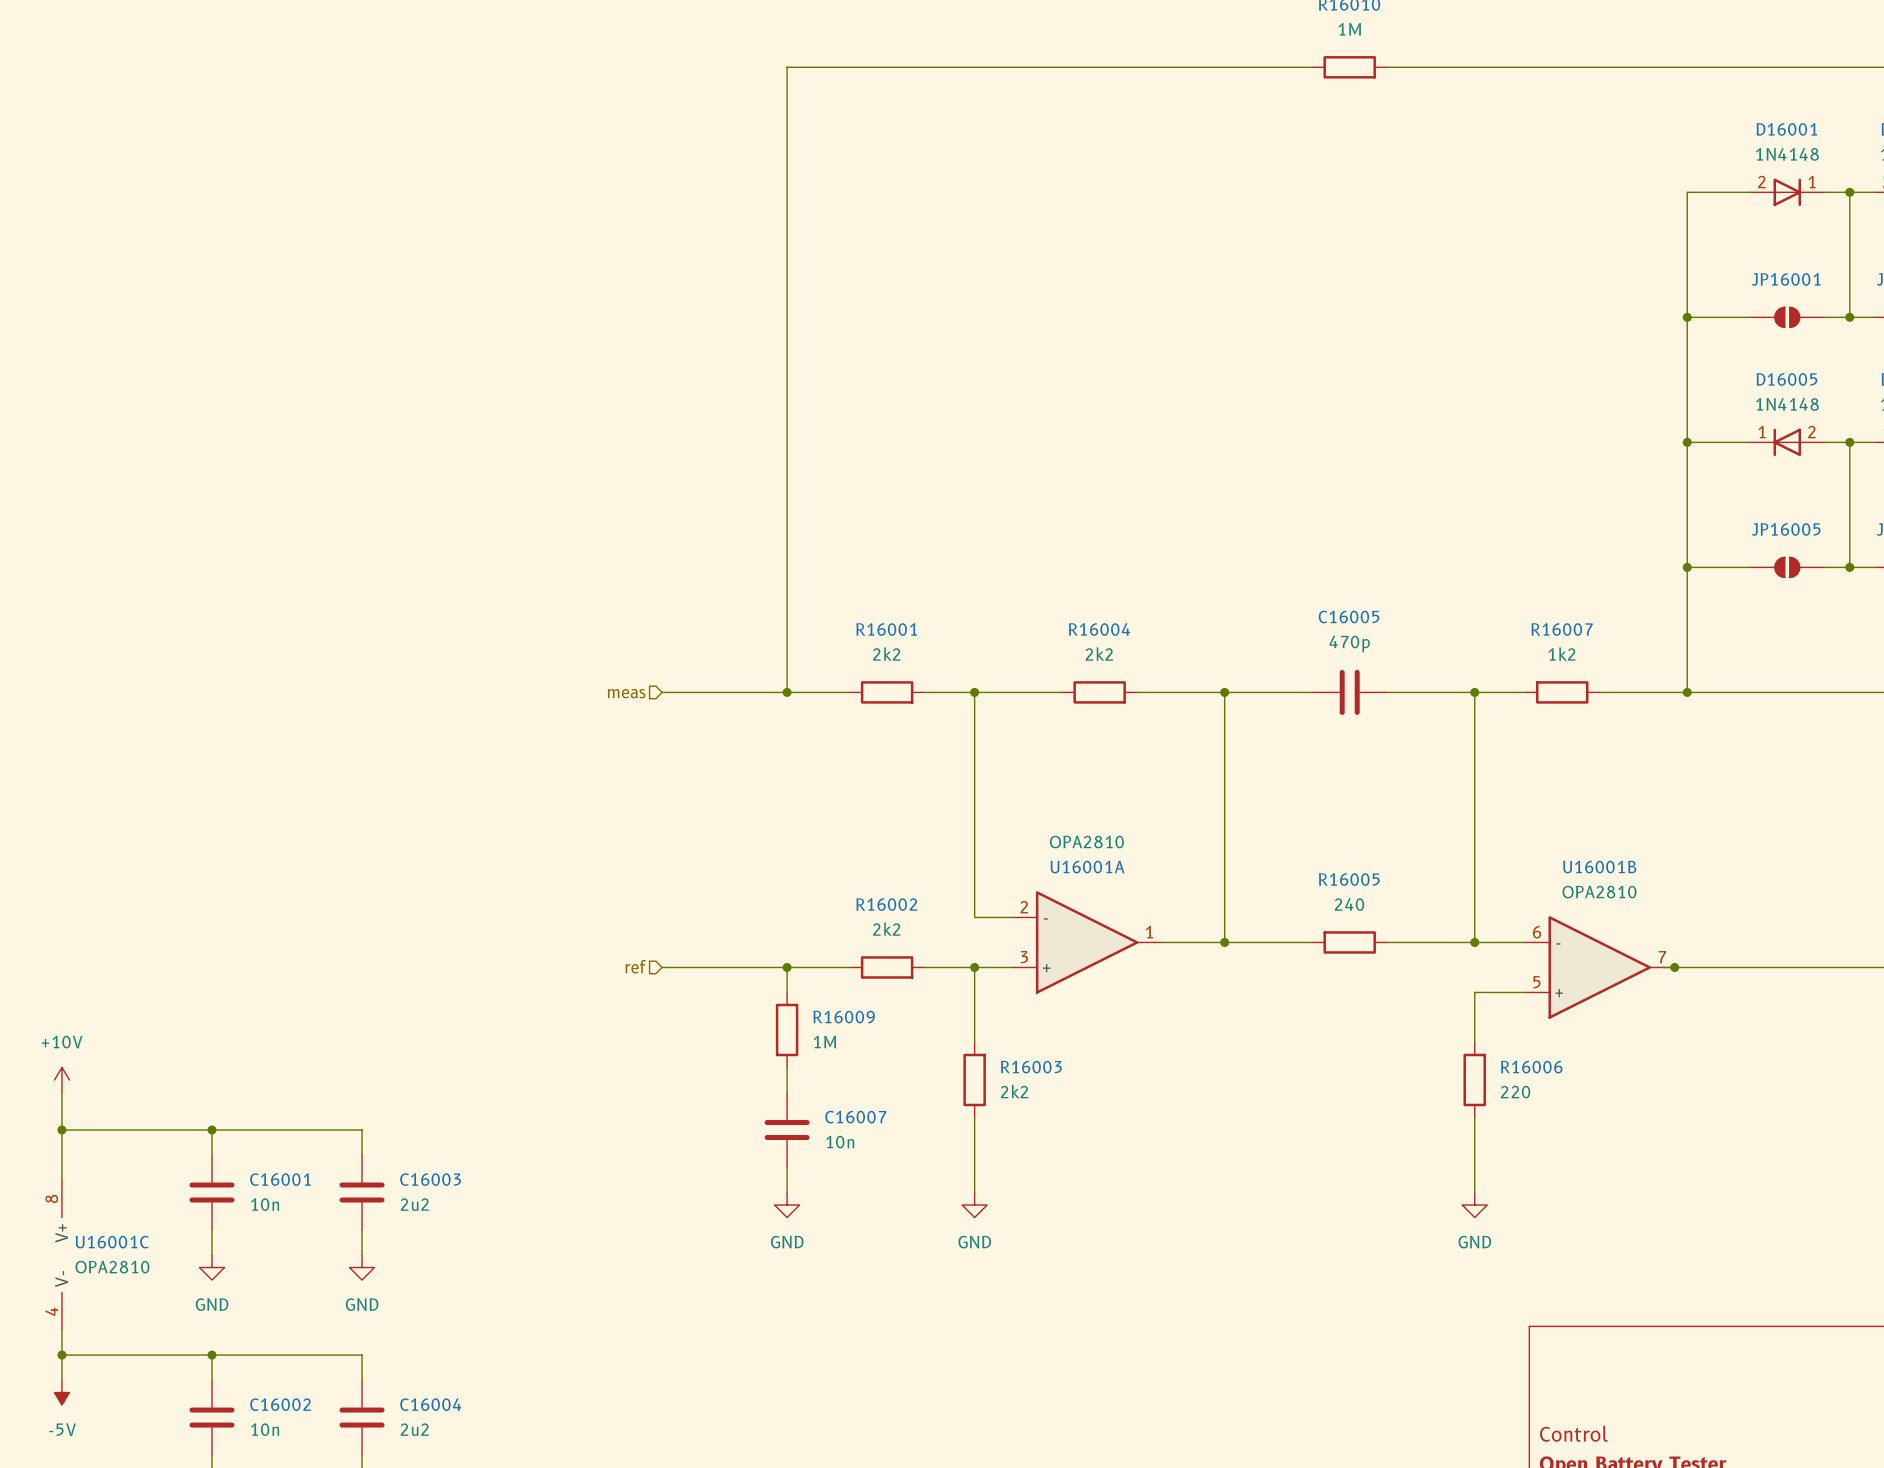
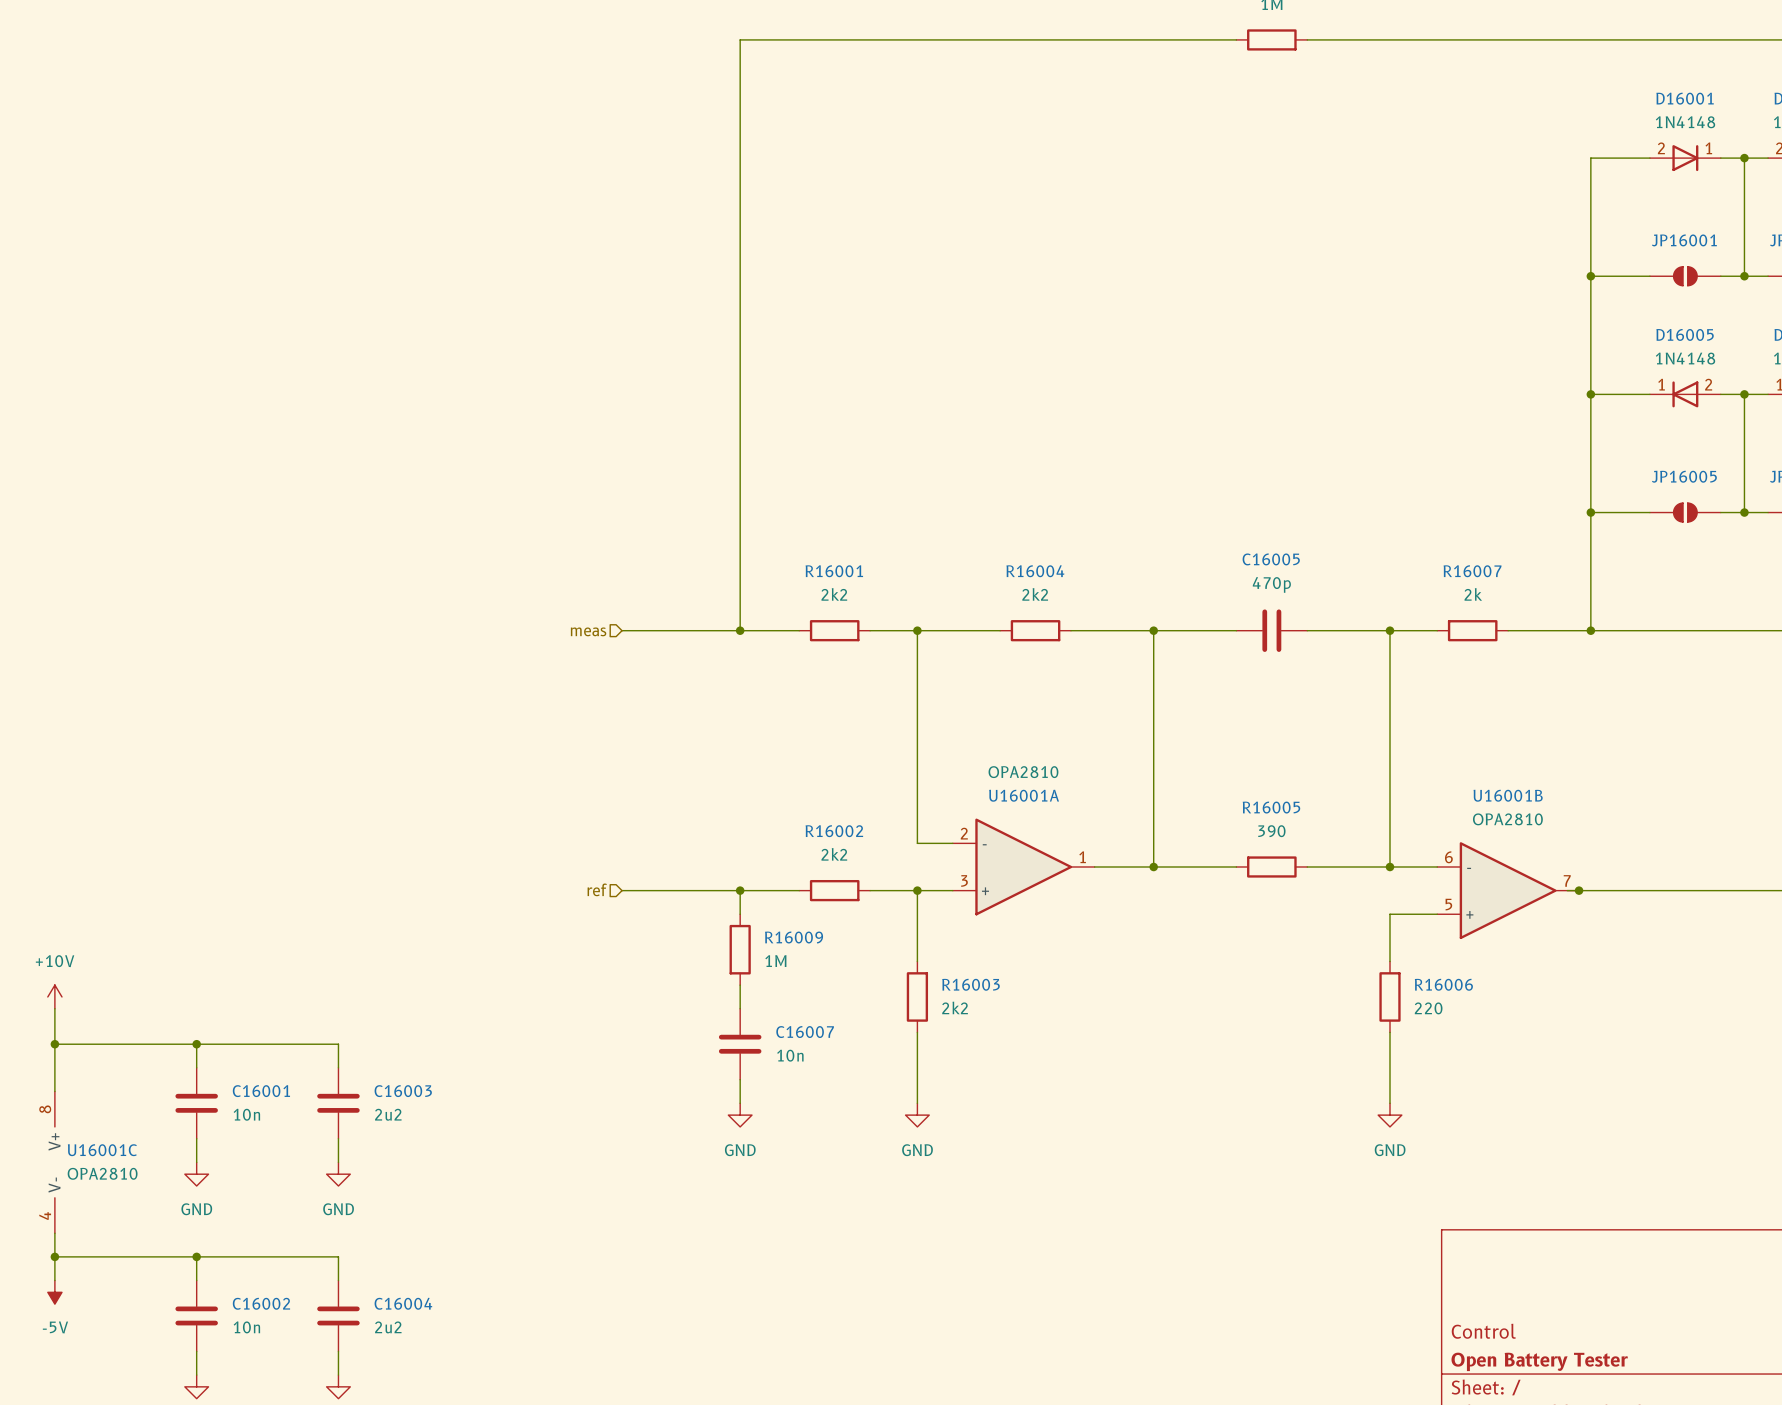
R16007 value: 1k2 (1562, 654) -> 2k (1473, 594)
R16005 value: 240 (1349, 904) -> 390 (1271, 831)

